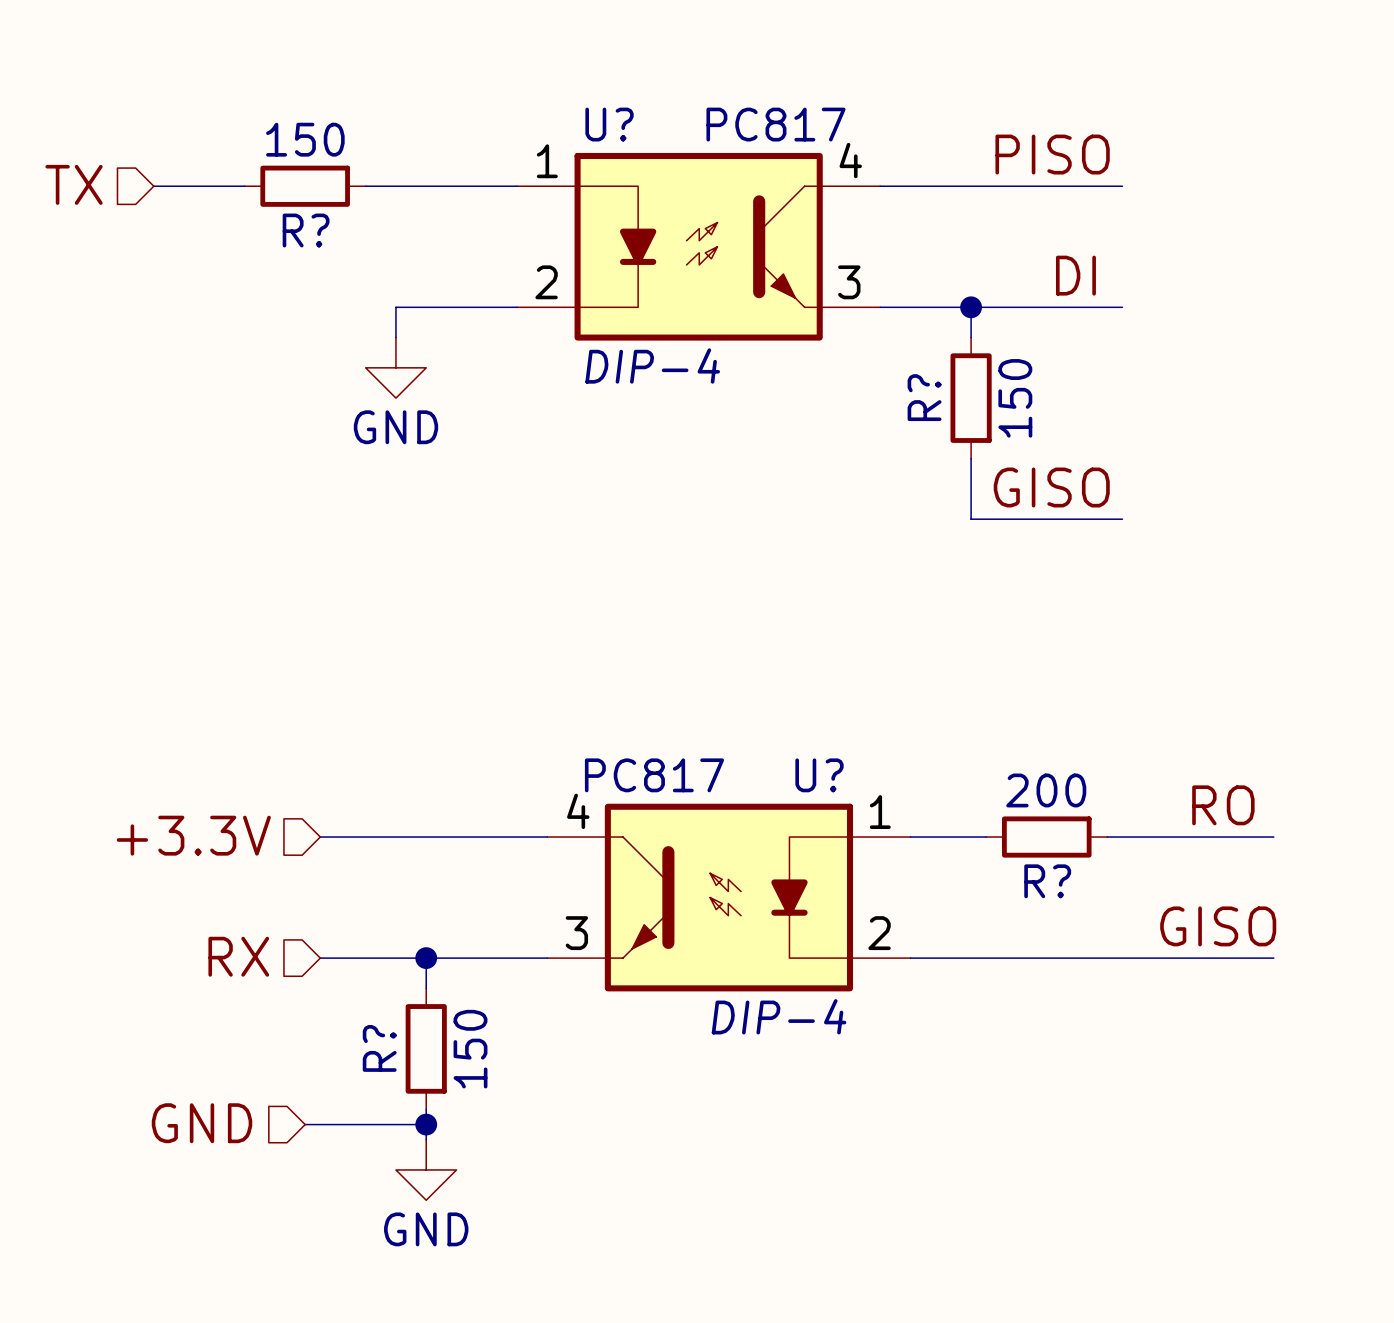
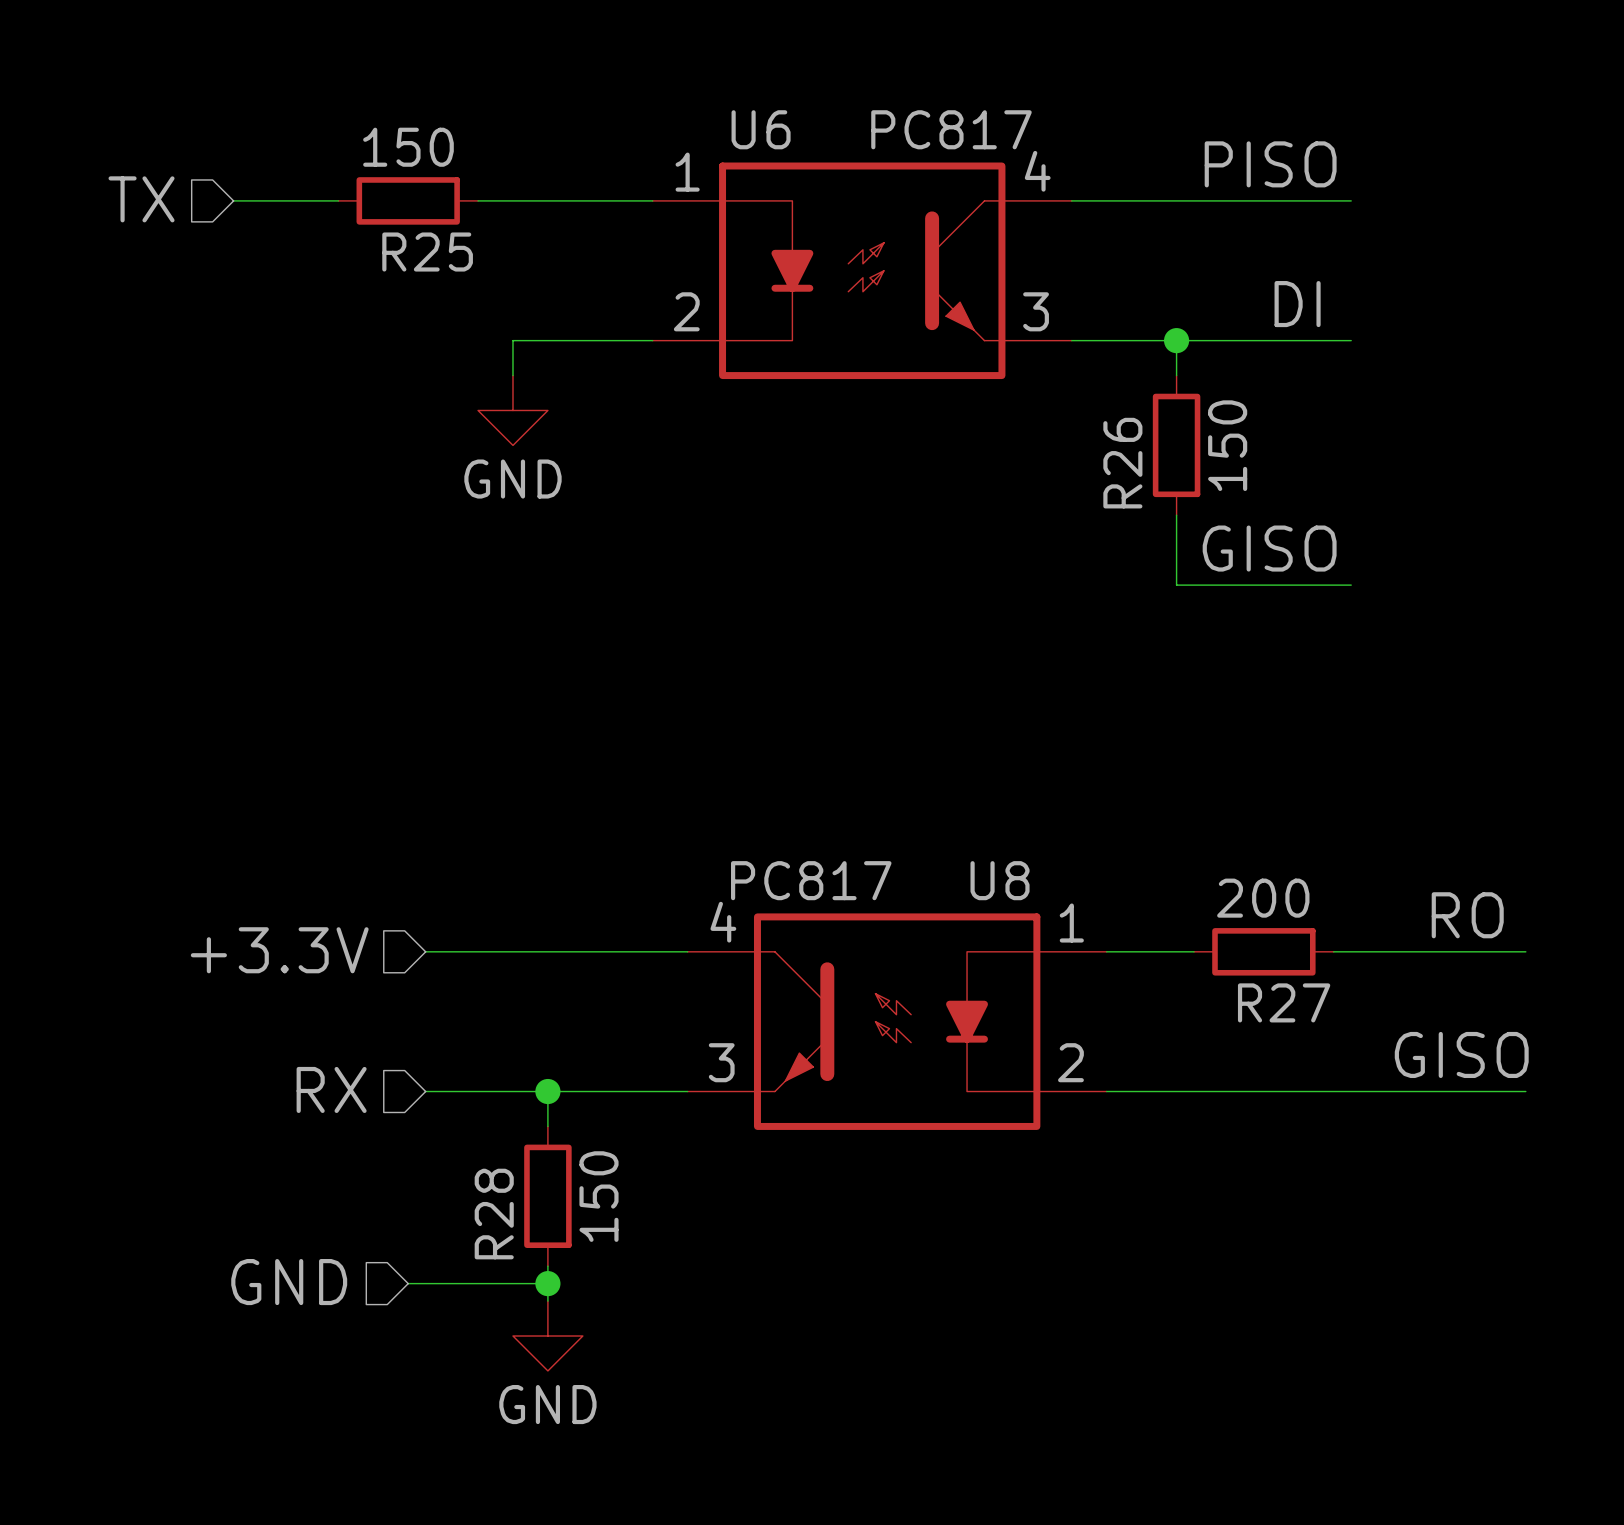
U? name: U? (609, 124) -> U6 (761, 129)
R? name: R? (306, 230) -> R25 (427, 252)
U? text: DIP-4 (652, 366) -> none
R? name: R? (924, 397) -> R26 (1122, 463)
U? name: U? (819, 775) -> U8 (1000, 880)
R? name: R? (1047, 881) -> R27 (1284, 1002)
U? text: DIP-4 (779, 1016) -> none
R? name: R? (379, 1048) -> R28 (494, 1214)

